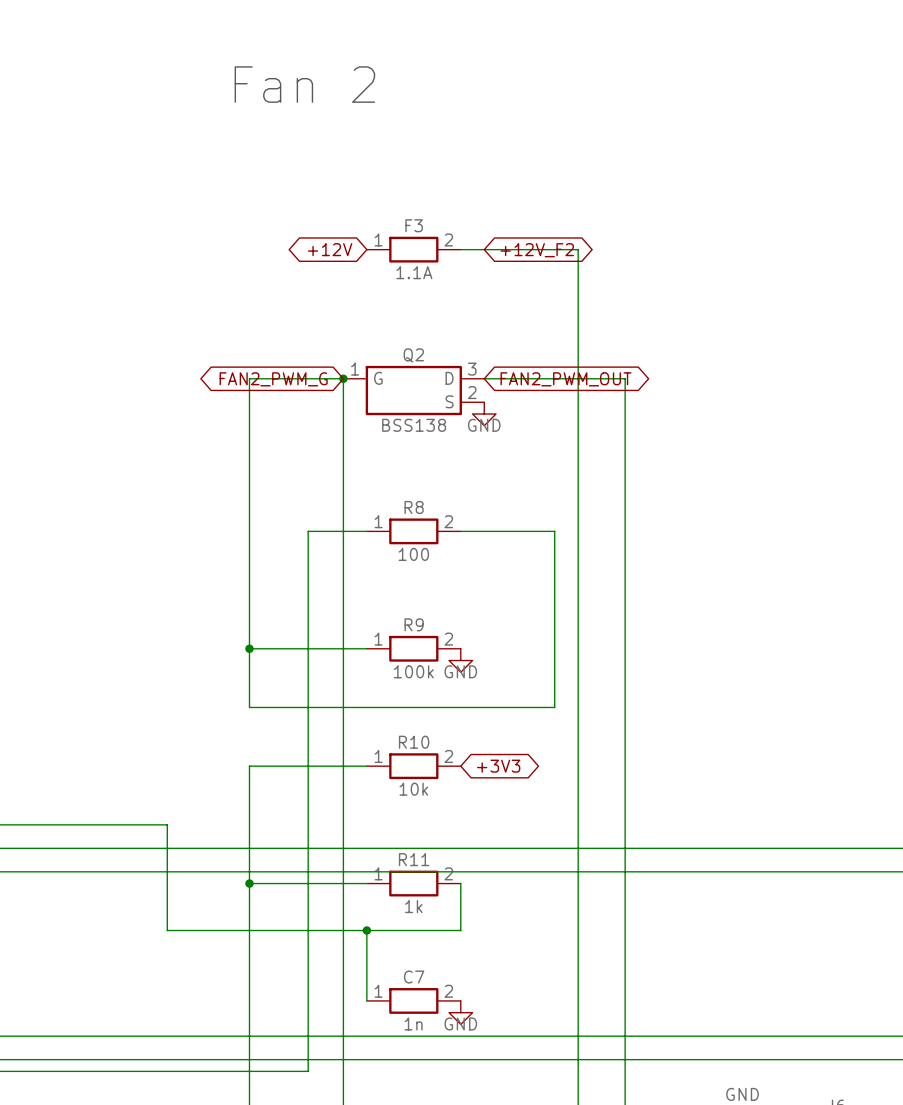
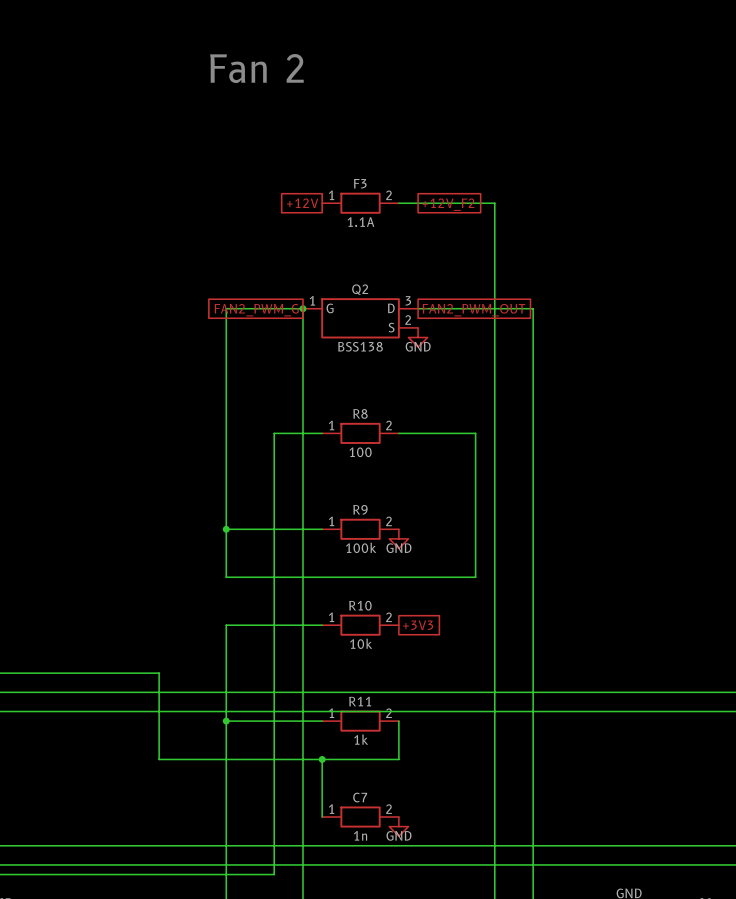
global label shape: bidirectional (330, 249) -> passive (302, 203)
global label shape: bidirectional (537, 250) -> passive (448, 204)
global label shape: bidirectional (273, 379) -> passive (256, 310)
global label shape: bidirectional (566, 379) -> passive (473, 310)
global label shape: bidirectional (498, 766) -> passive (418, 625)

